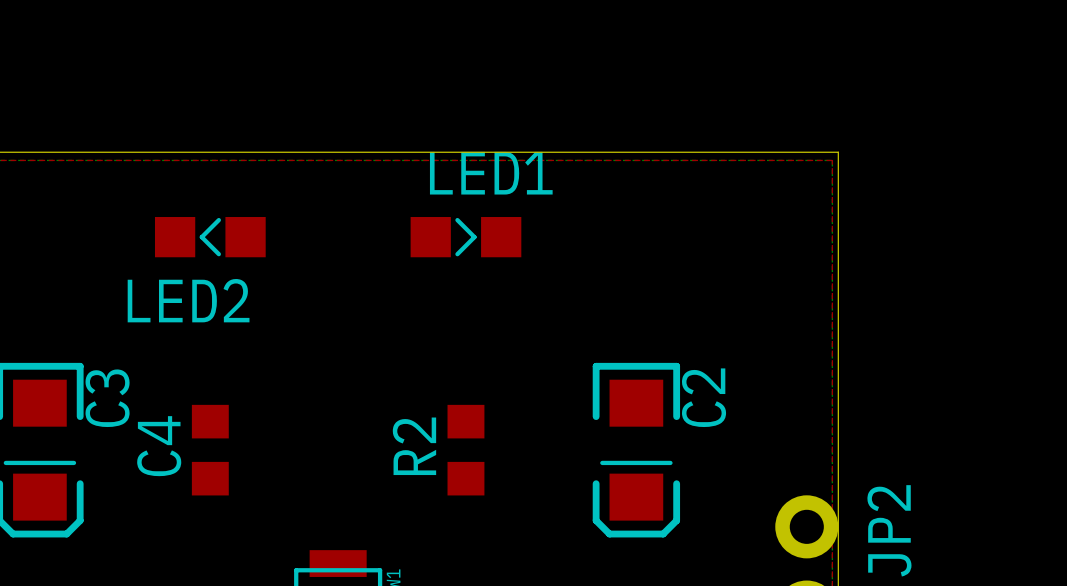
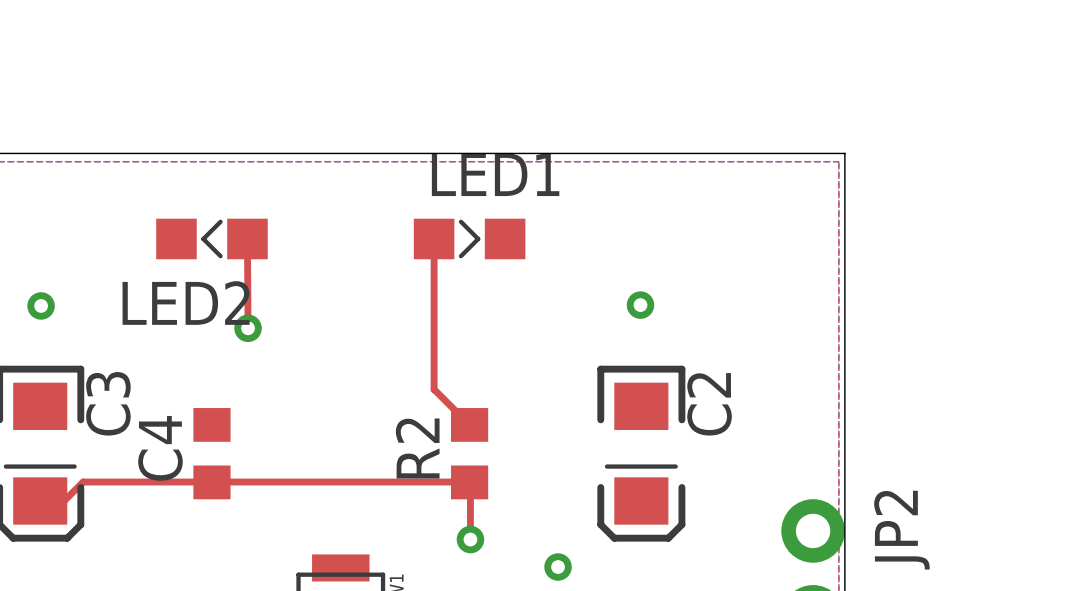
top track: none -> (247, 238) (248, 328)
top track: none -> (434, 238) (434, 389) (469, 424)
via: none -> (640, 305)
via: none -> (41, 305)
via: none -> (248, 328)
top track: none -> (211, 482) (83, 482) (64, 500) (40, 500)
top track: none -> (469, 482) (211, 482)
top track: none -> (469, 482) (470, 539)
via: none -> (470, 539)
via: none -> (558, 567)

